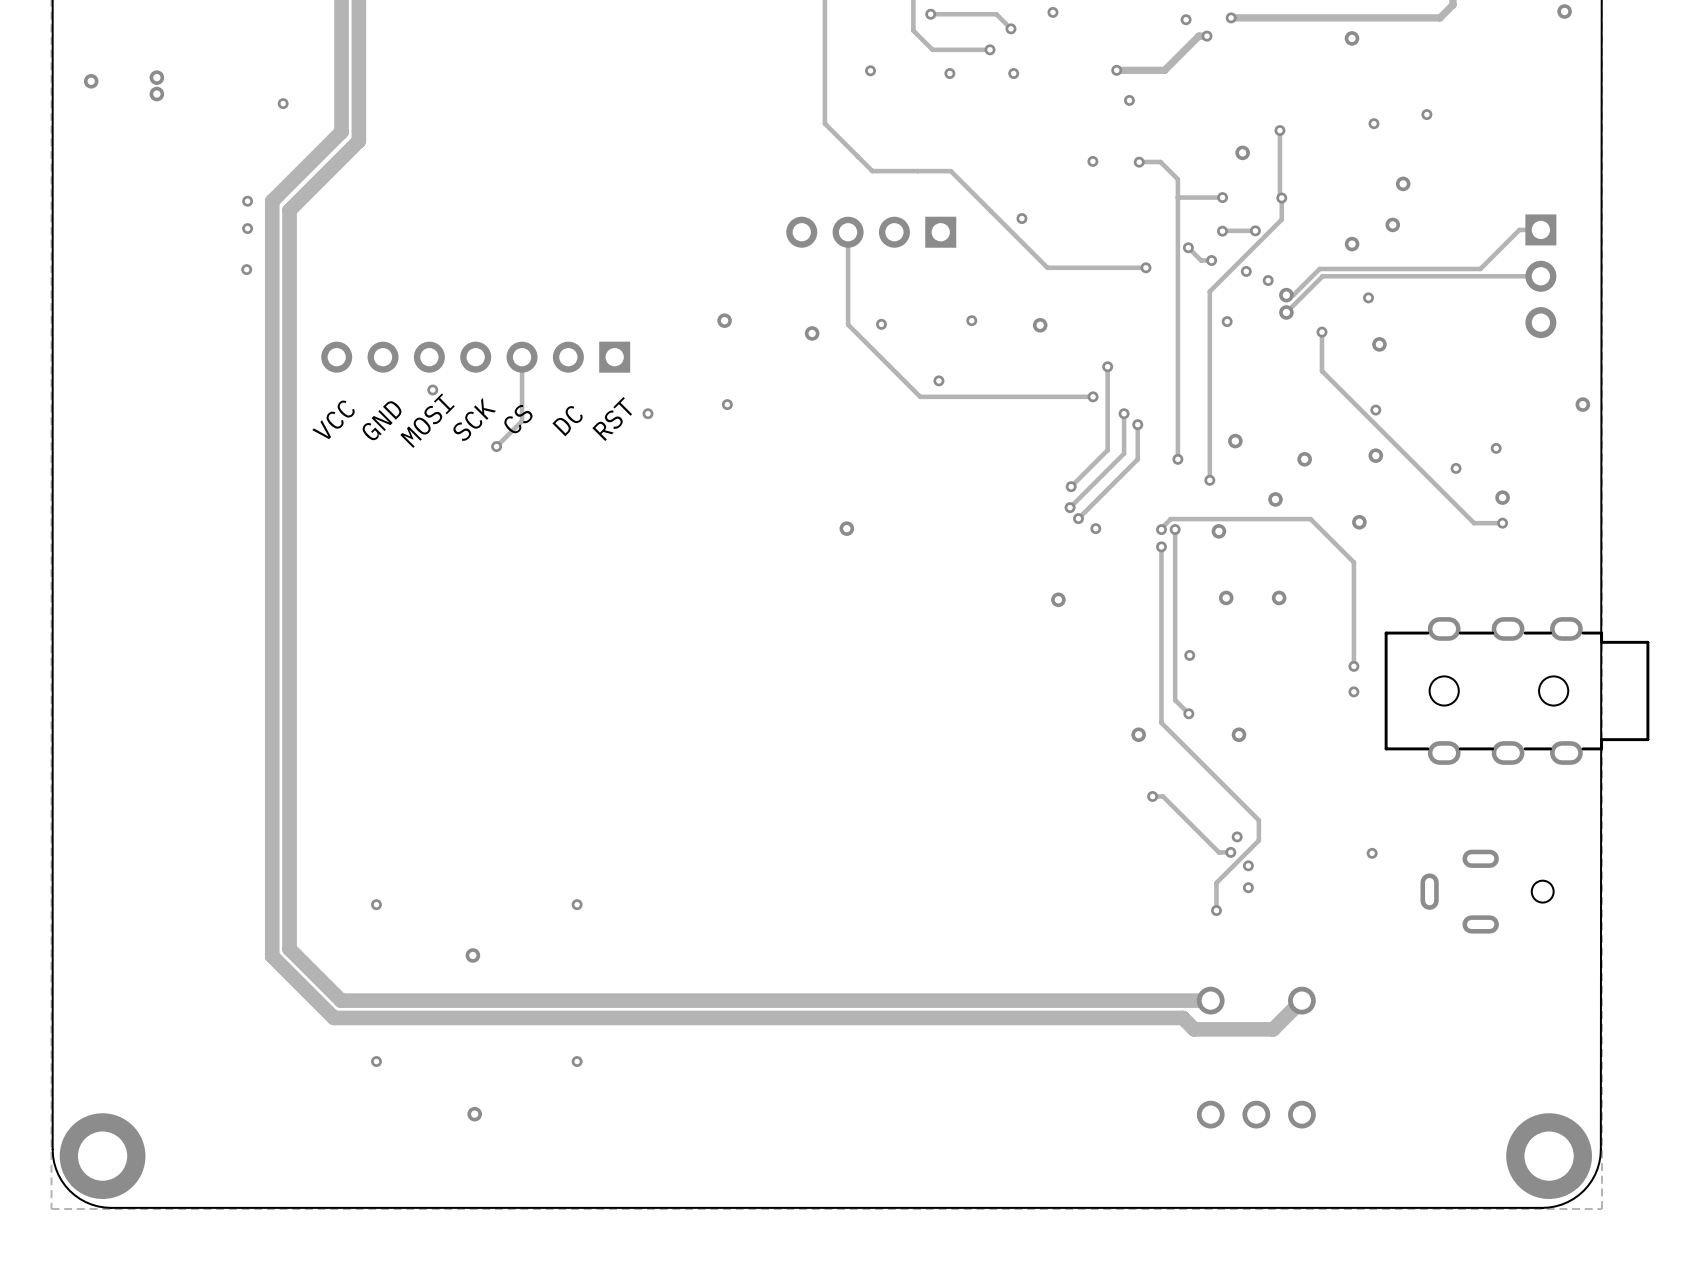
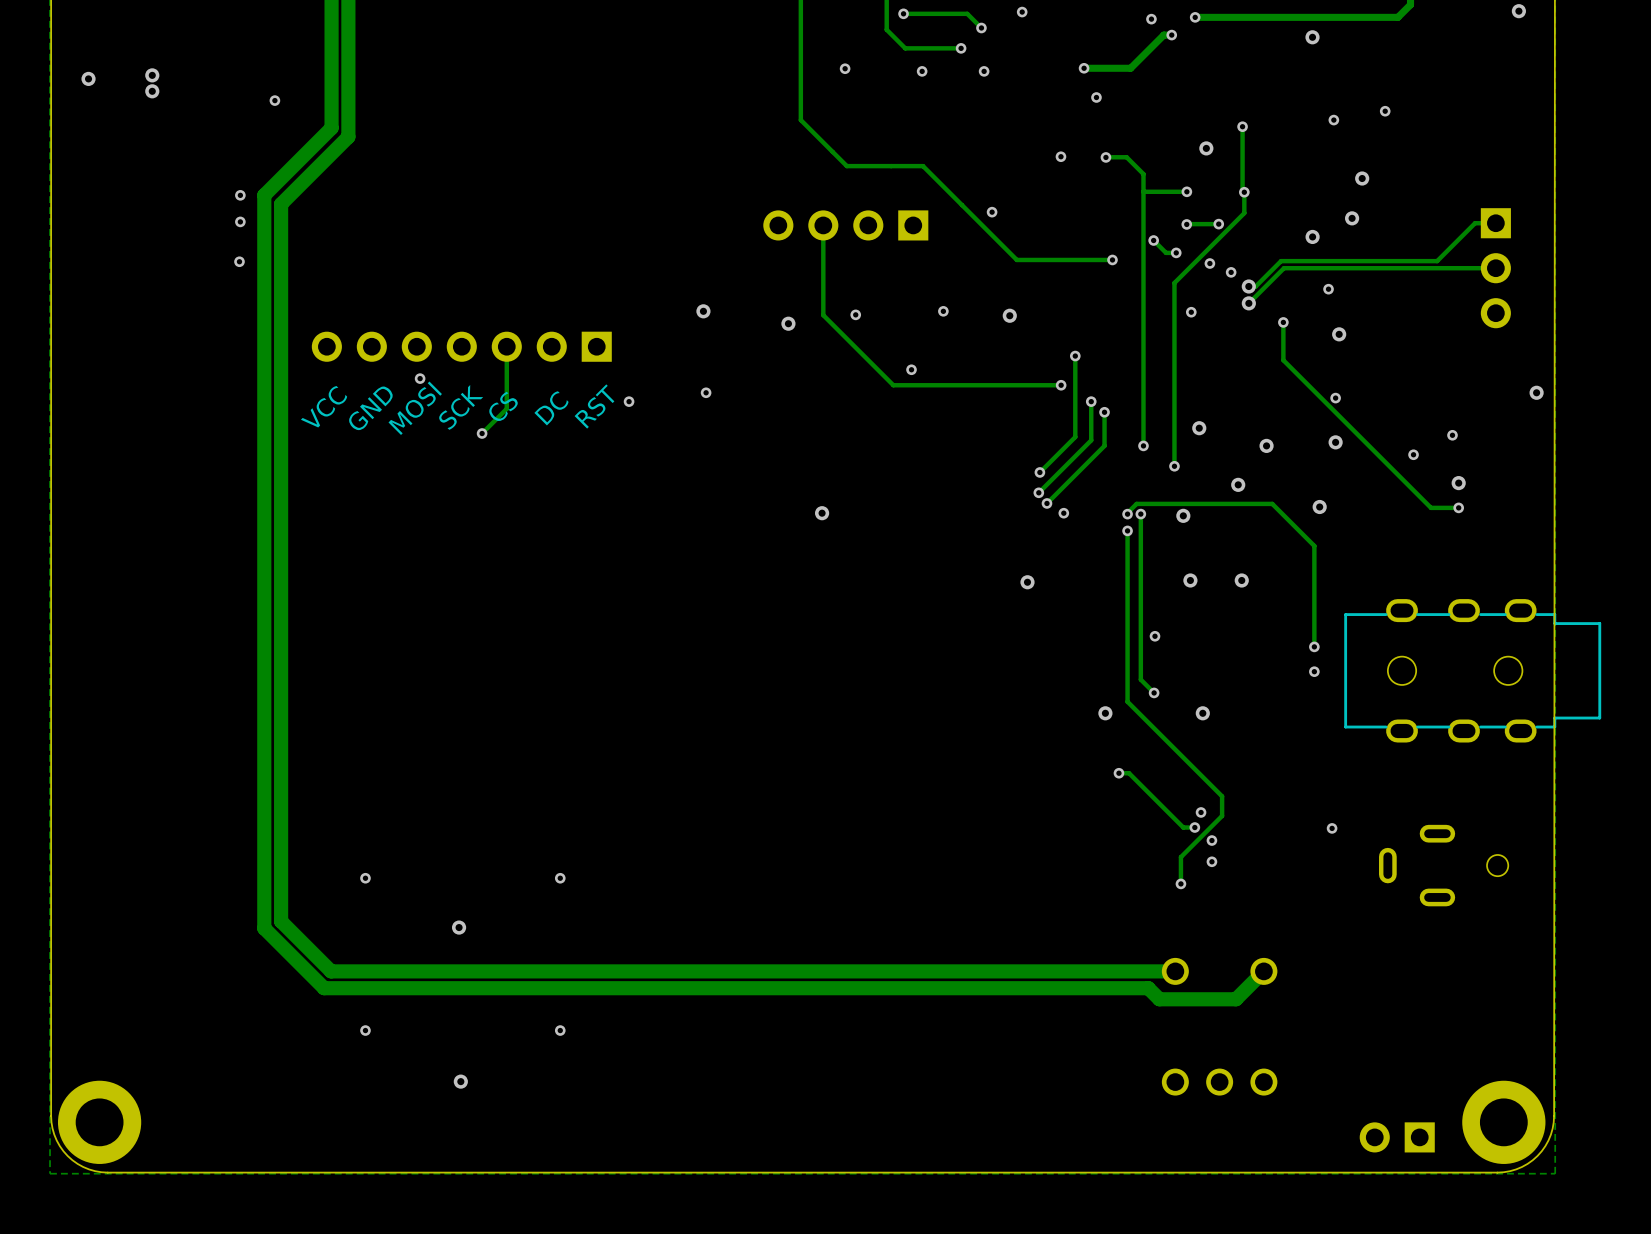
part: none -> (1397, 1137)

